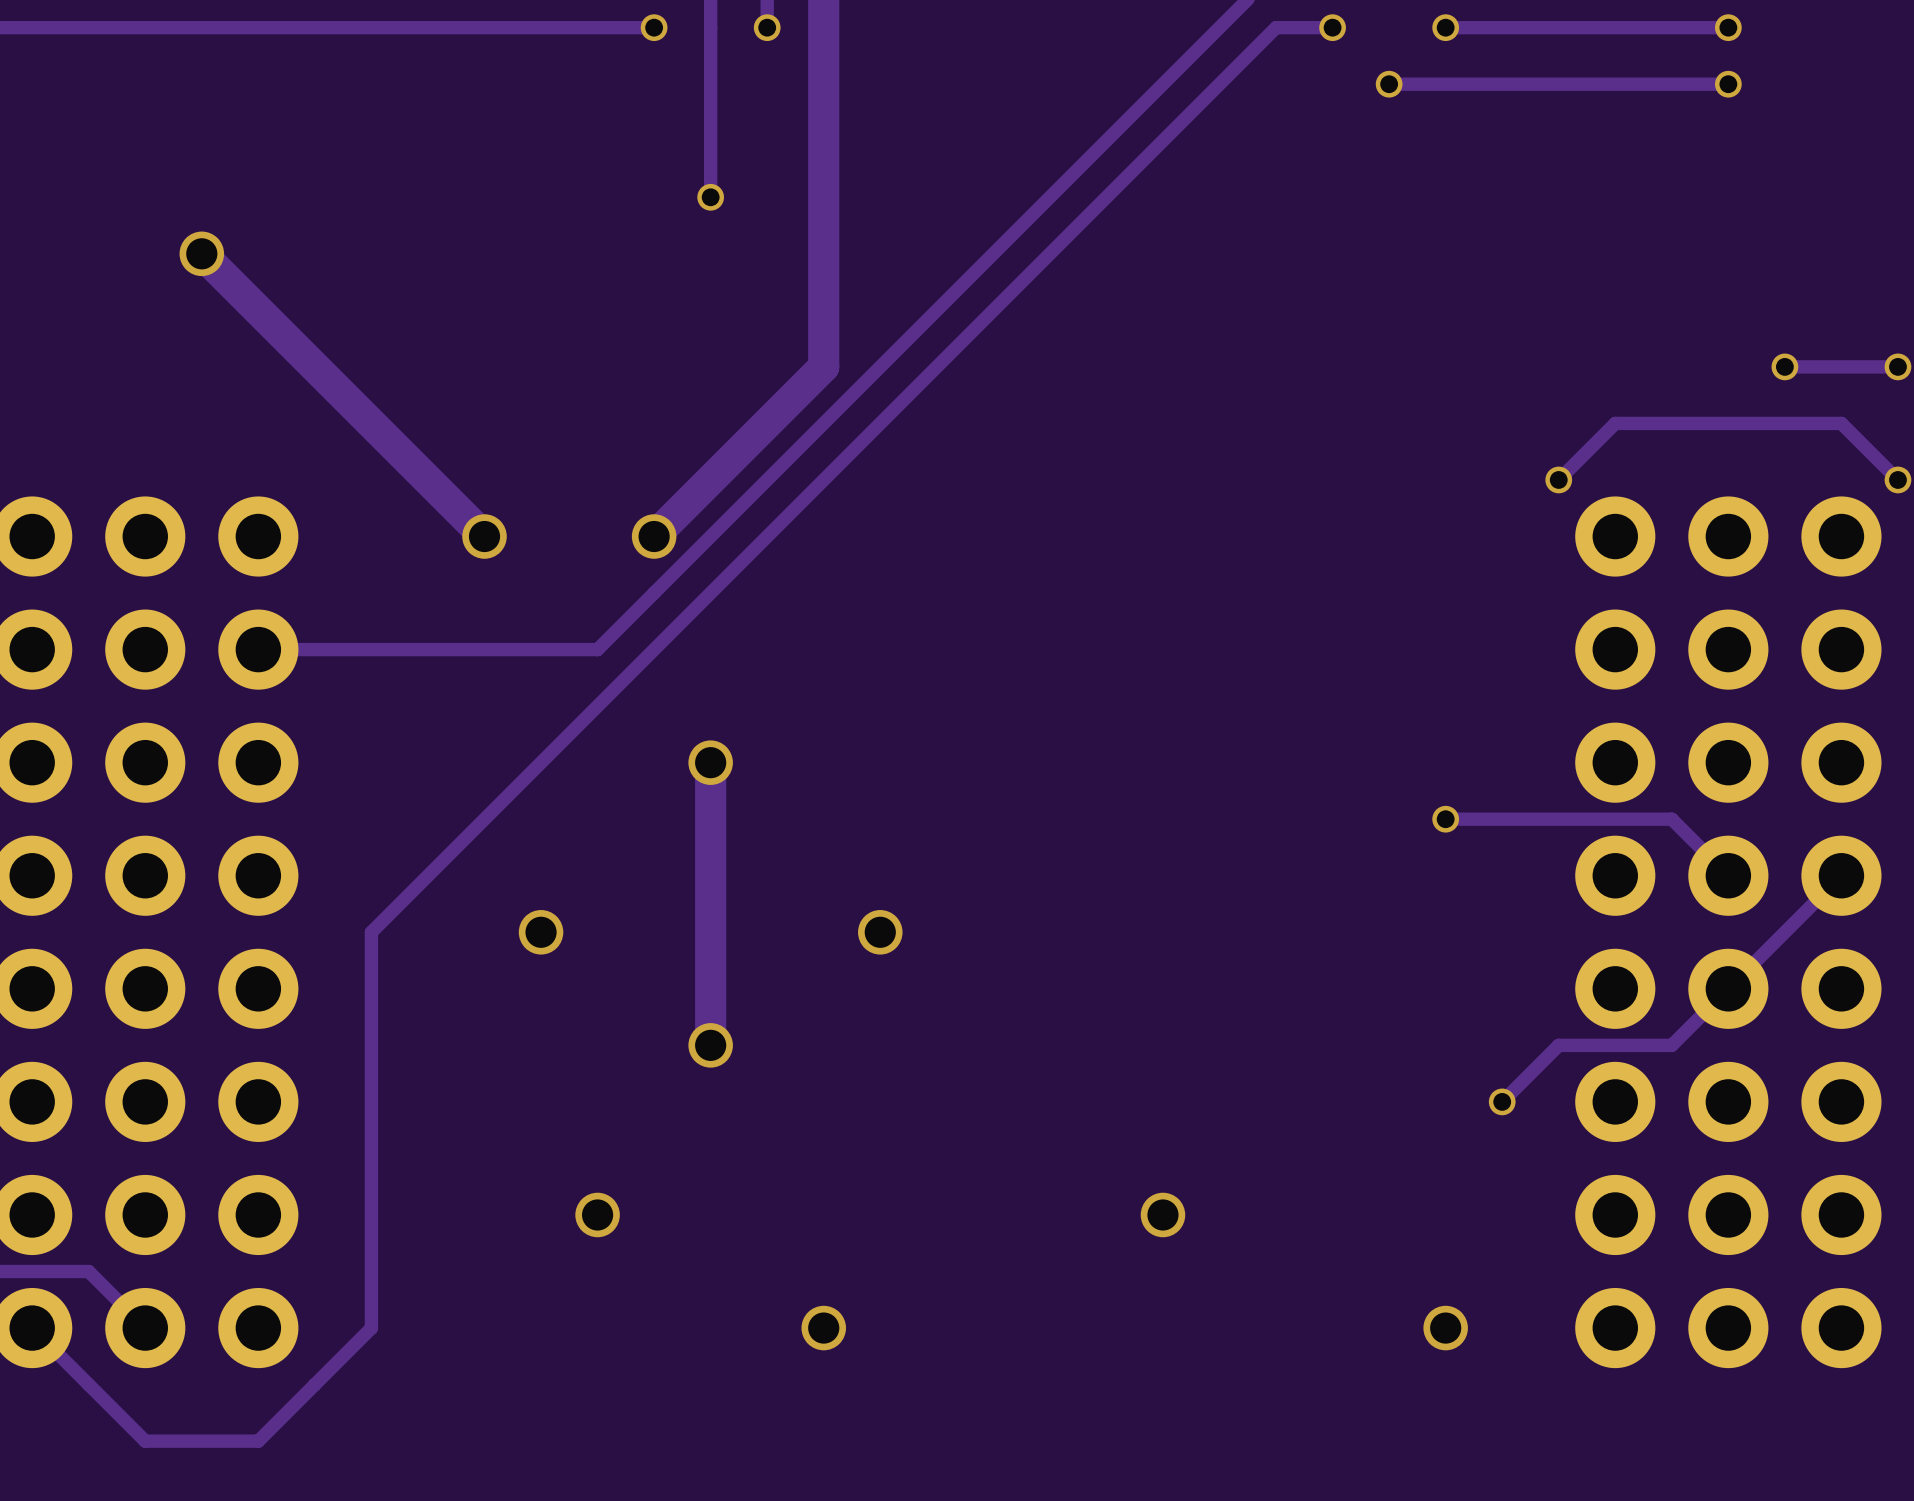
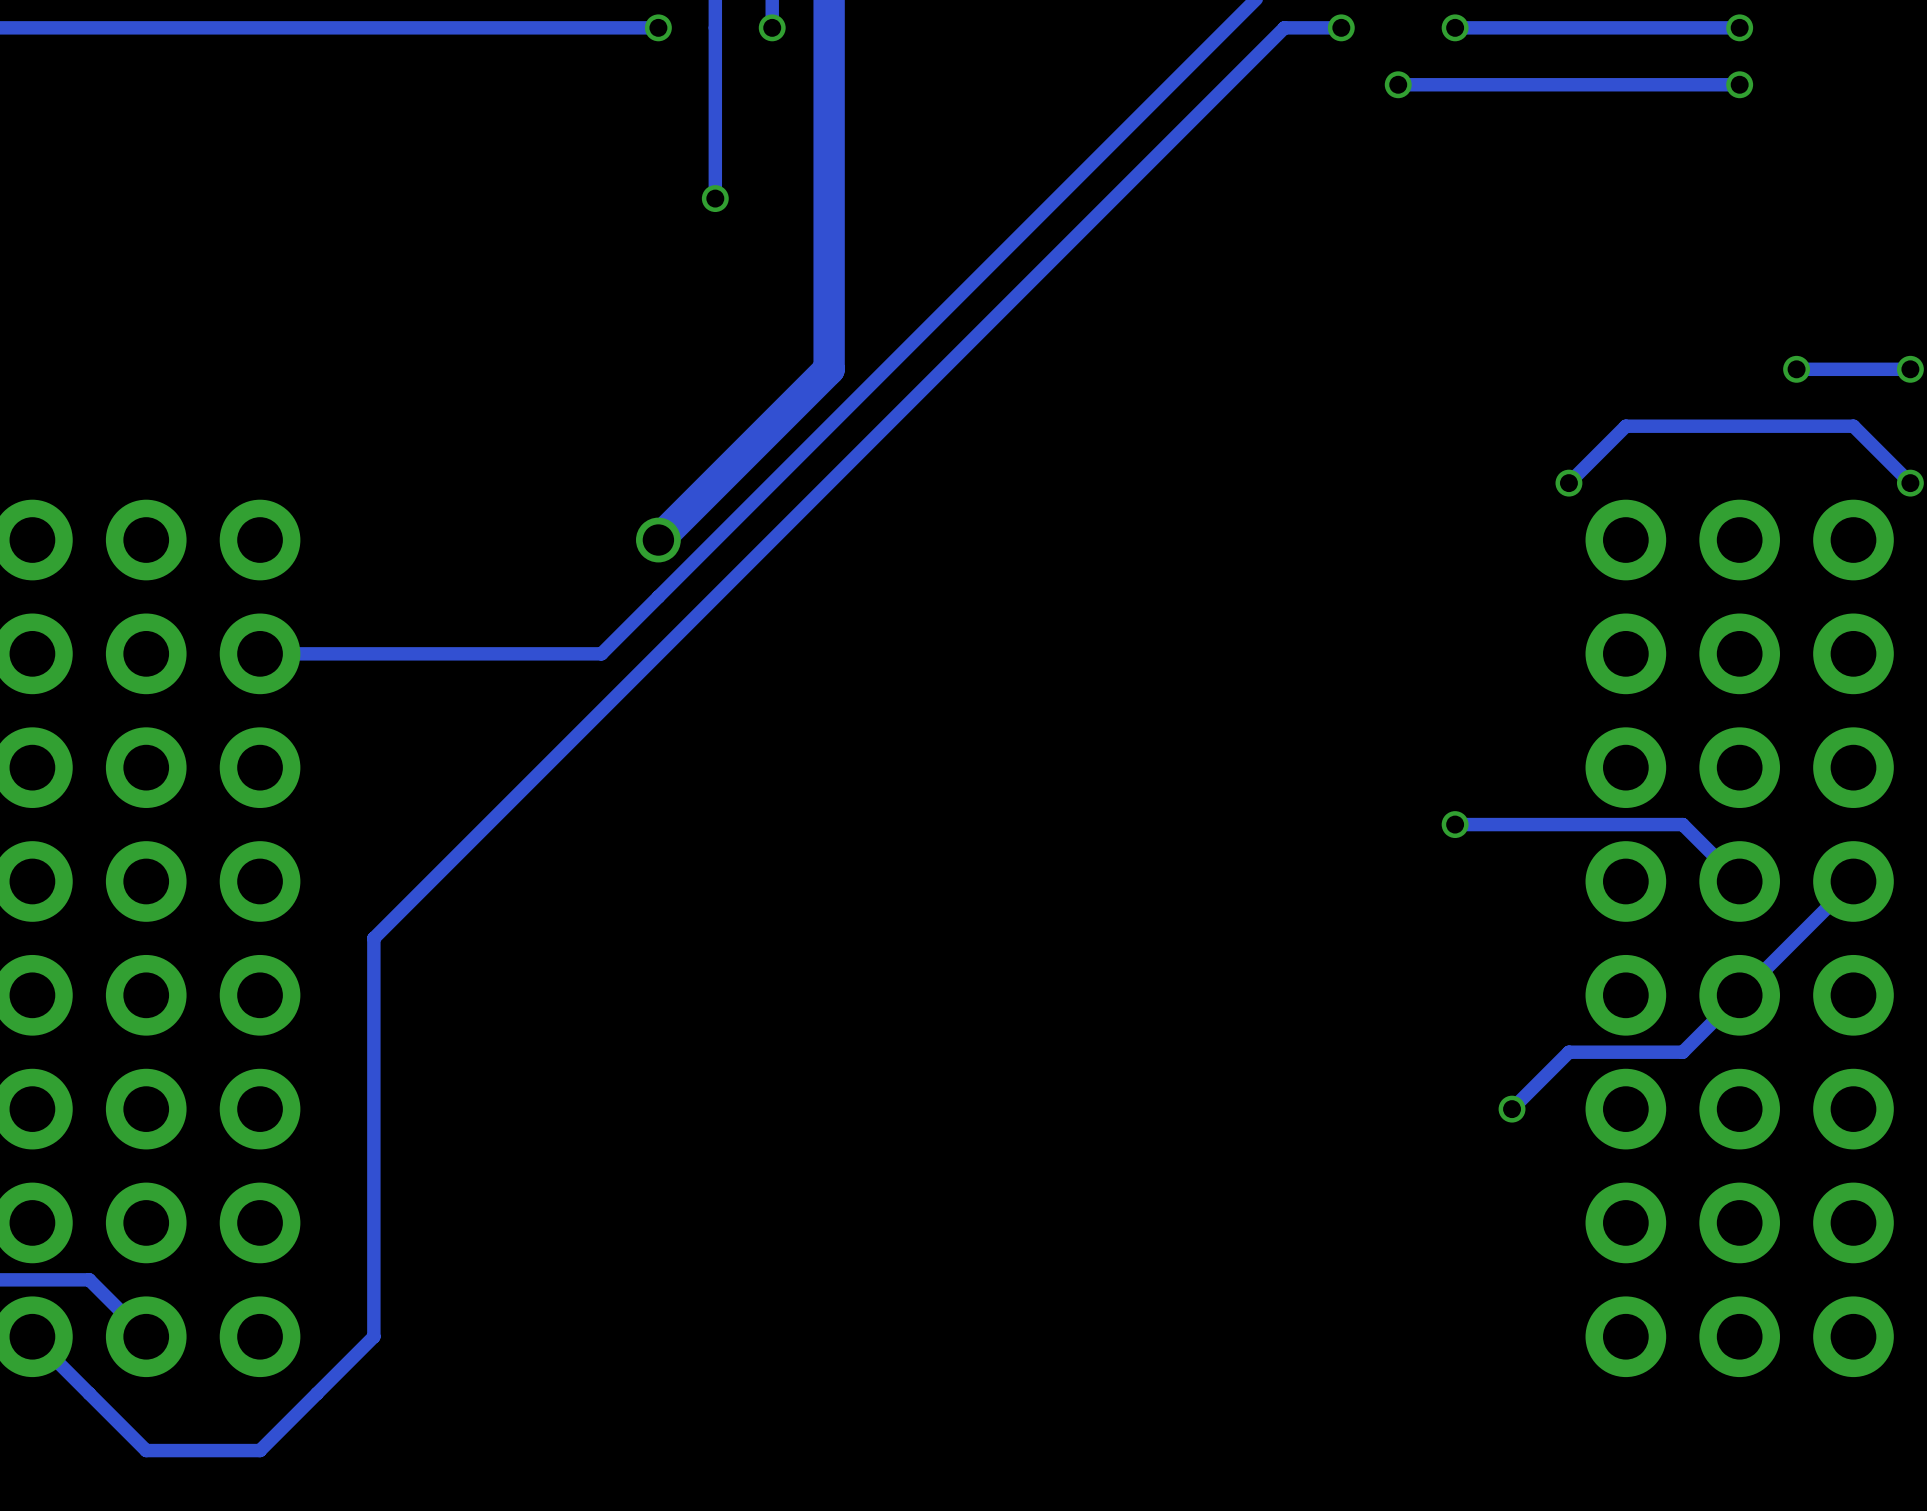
track: (201, 253) (484, 536) -> none
via: (201, 253) -> none
via: (484, 536) -> none
track: (710, 762) (710, 1045) -> none
via: (710, 762) -> none
via: (541, 932) -> none
via: (880, 932) -> none
via: (710, 1045) -> none
via: (597, 1214) -> none
via: (1162, 1214) -> none
via: (823, 1328) -> none
via: (1445, 1328) -> none

